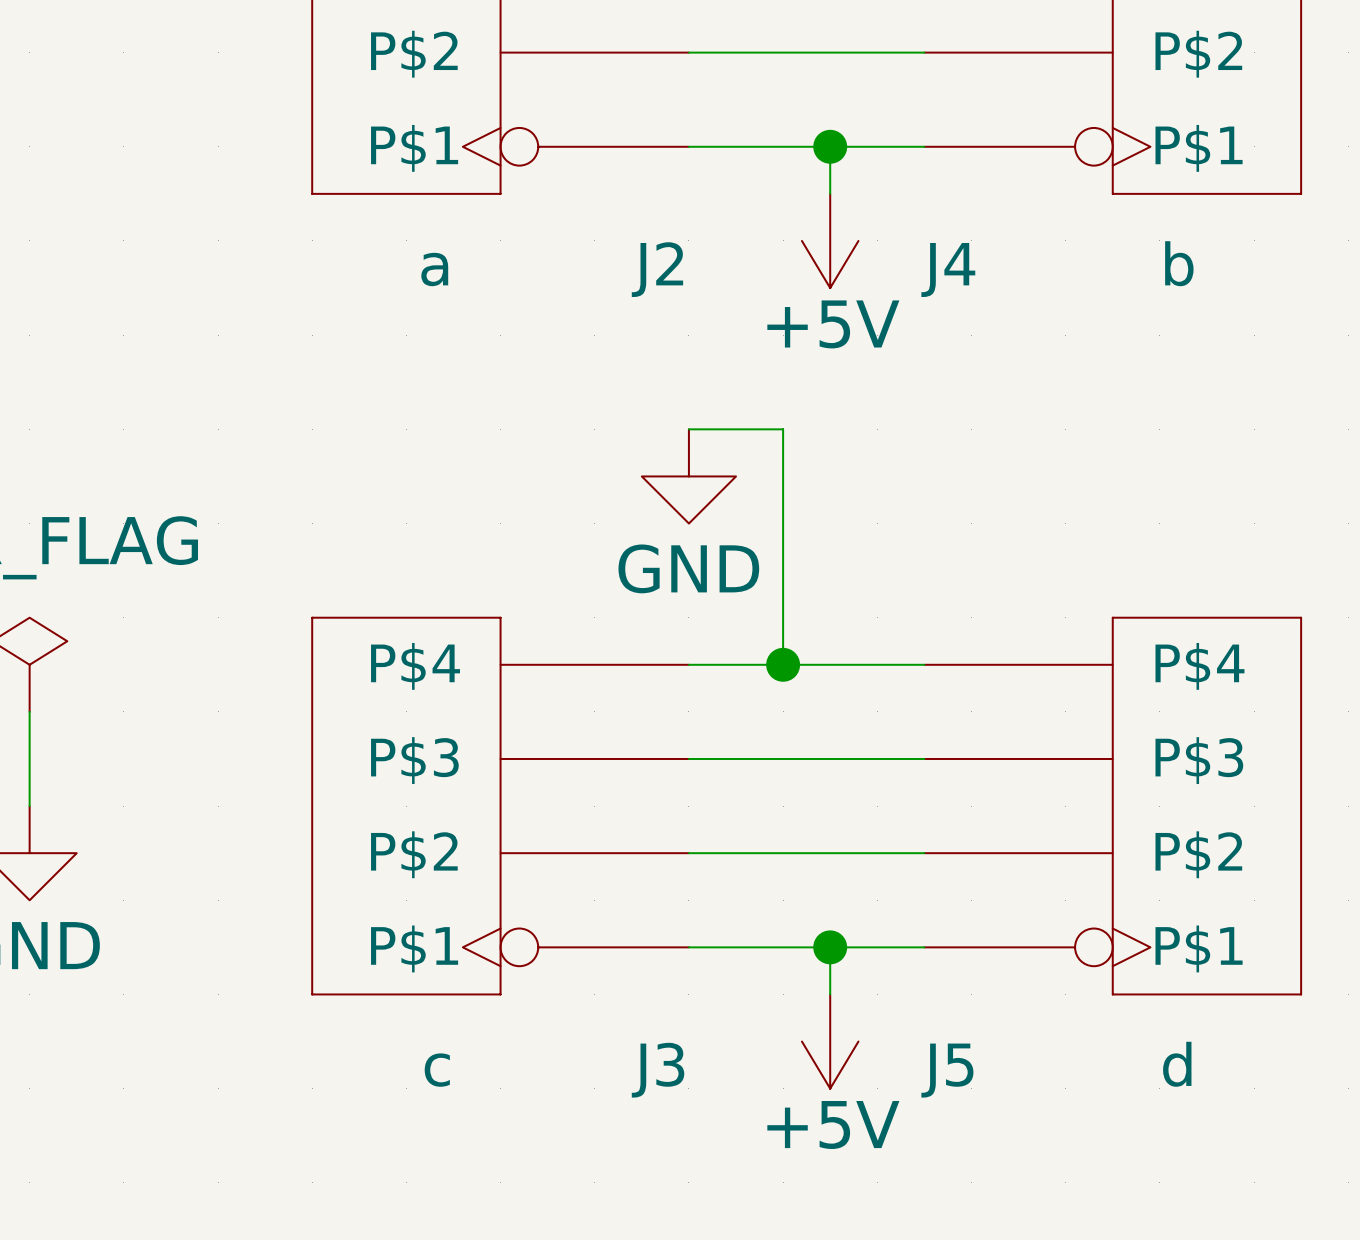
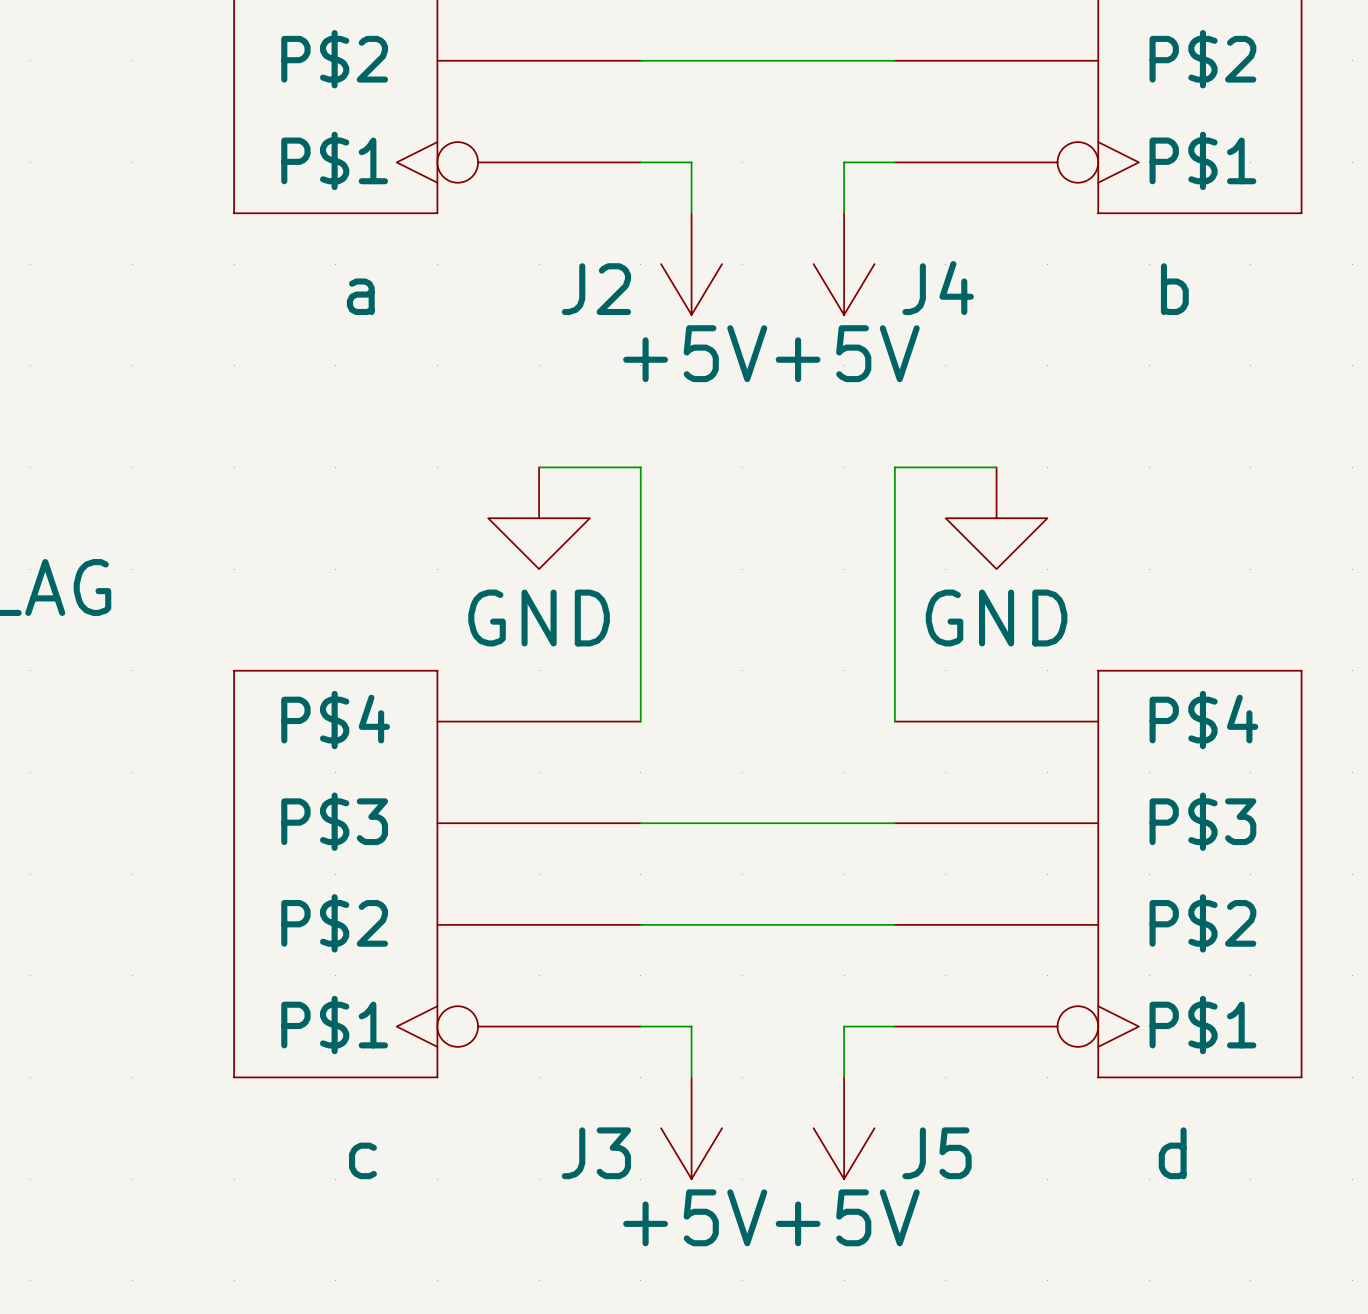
wire: (736, 146) (877, 146) -> (691, 162) (691, 213)
wire: (830, 146) (830, 193) -> (844, 162) (844, 213)
junction: (830, 146) -> none
power symbol: none -> +5V (691, 264)
power symbol: +5V (830, 240) -> none
power symbol: none -> +5V (844, 264)
wire: (688, 429) (783, 429) (783, 664) -> (539, 467) (640, 467) (640, 721)
power symbol position: GND (688, 476) -> GND (539, 518)
power symbol: none -> GND (996, 518)
wire: (688, 664) (924, 664) -> (996, 467) (894, 467) (894, 721)
junction: (783, 664) -> none
wire: (736, 947) (877, 947) -> (691, 1026) (691, 1077)
wire: (830, 947) (830, 994) -> (844, 1026) (844, 1077)
junction: (830, 947) -> none
power symbol: none -> +5V (691, 1128)
power symbol: +5V (830, 1041) -> none
power symbol: none -> +5V (844, 1128)

